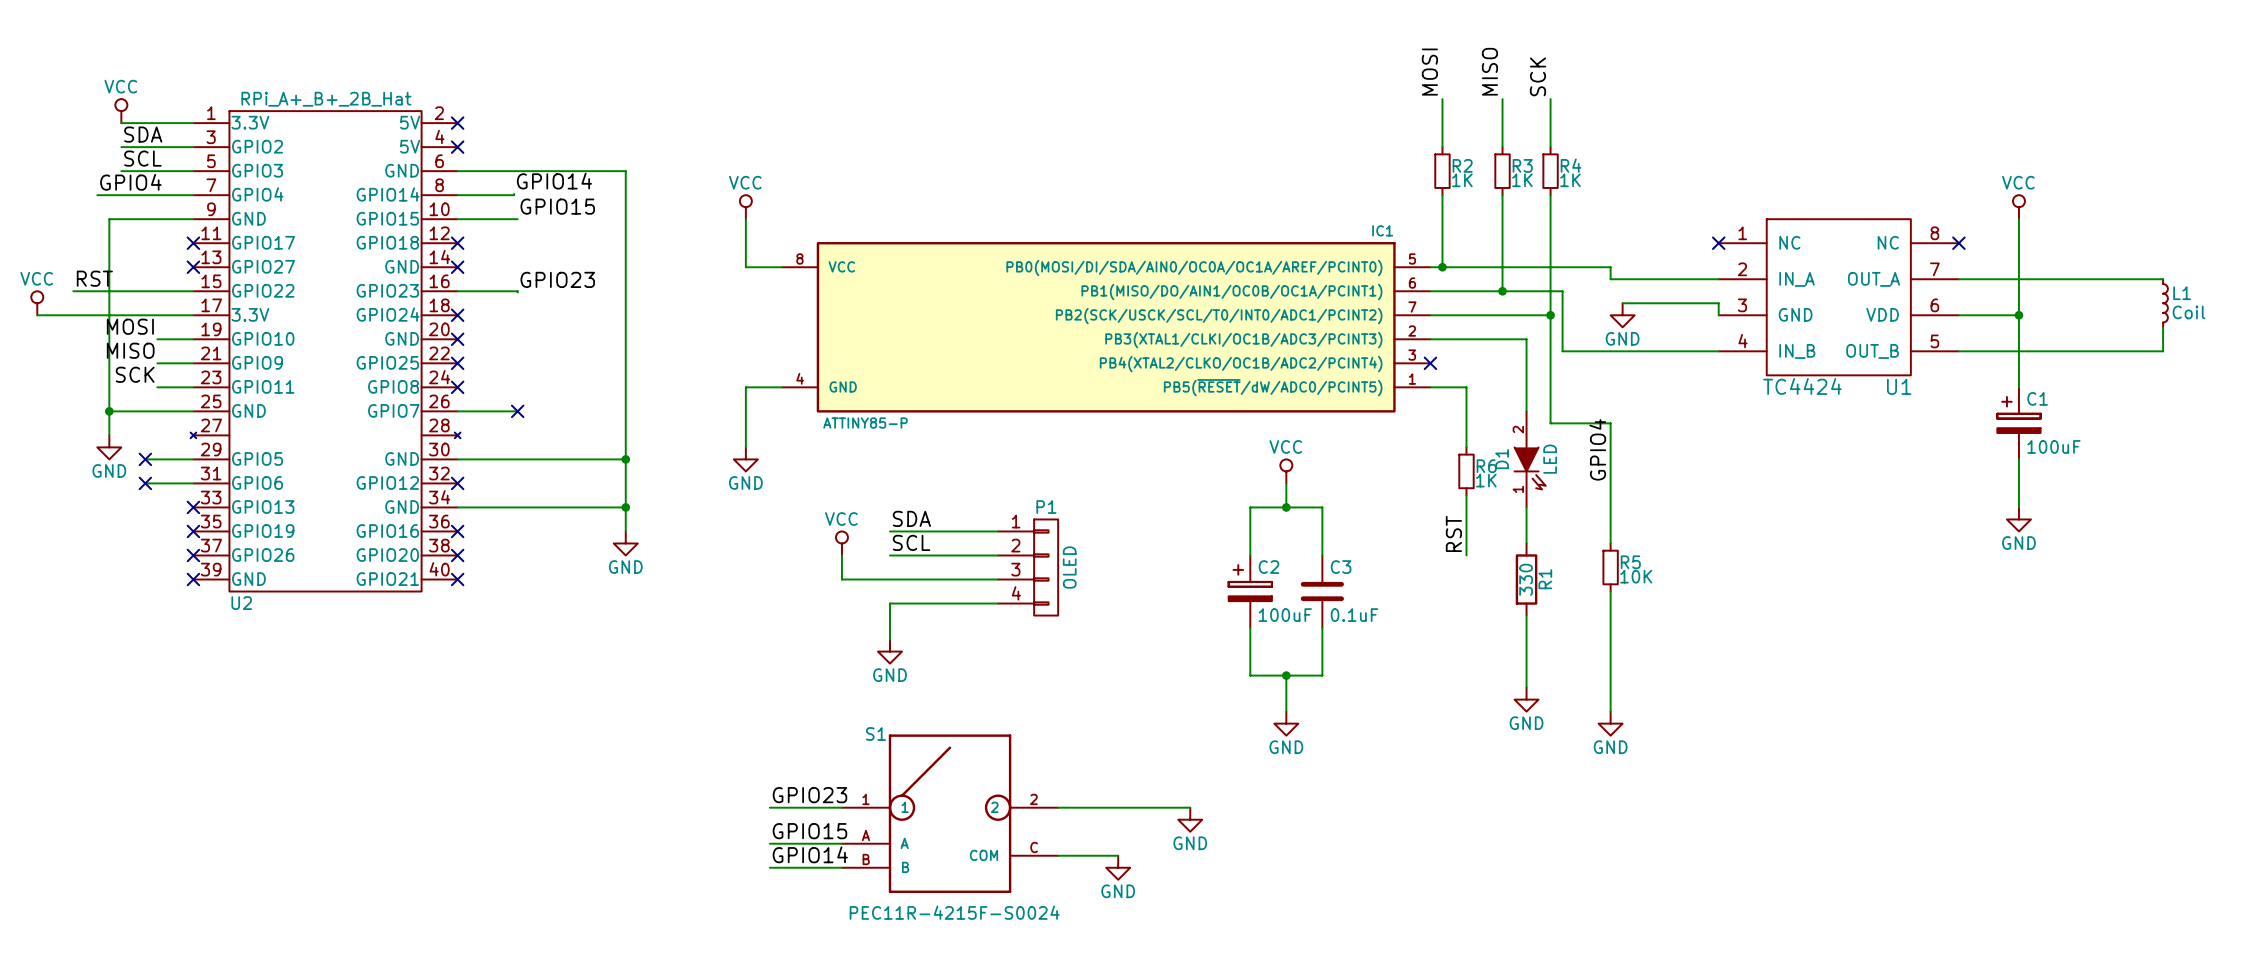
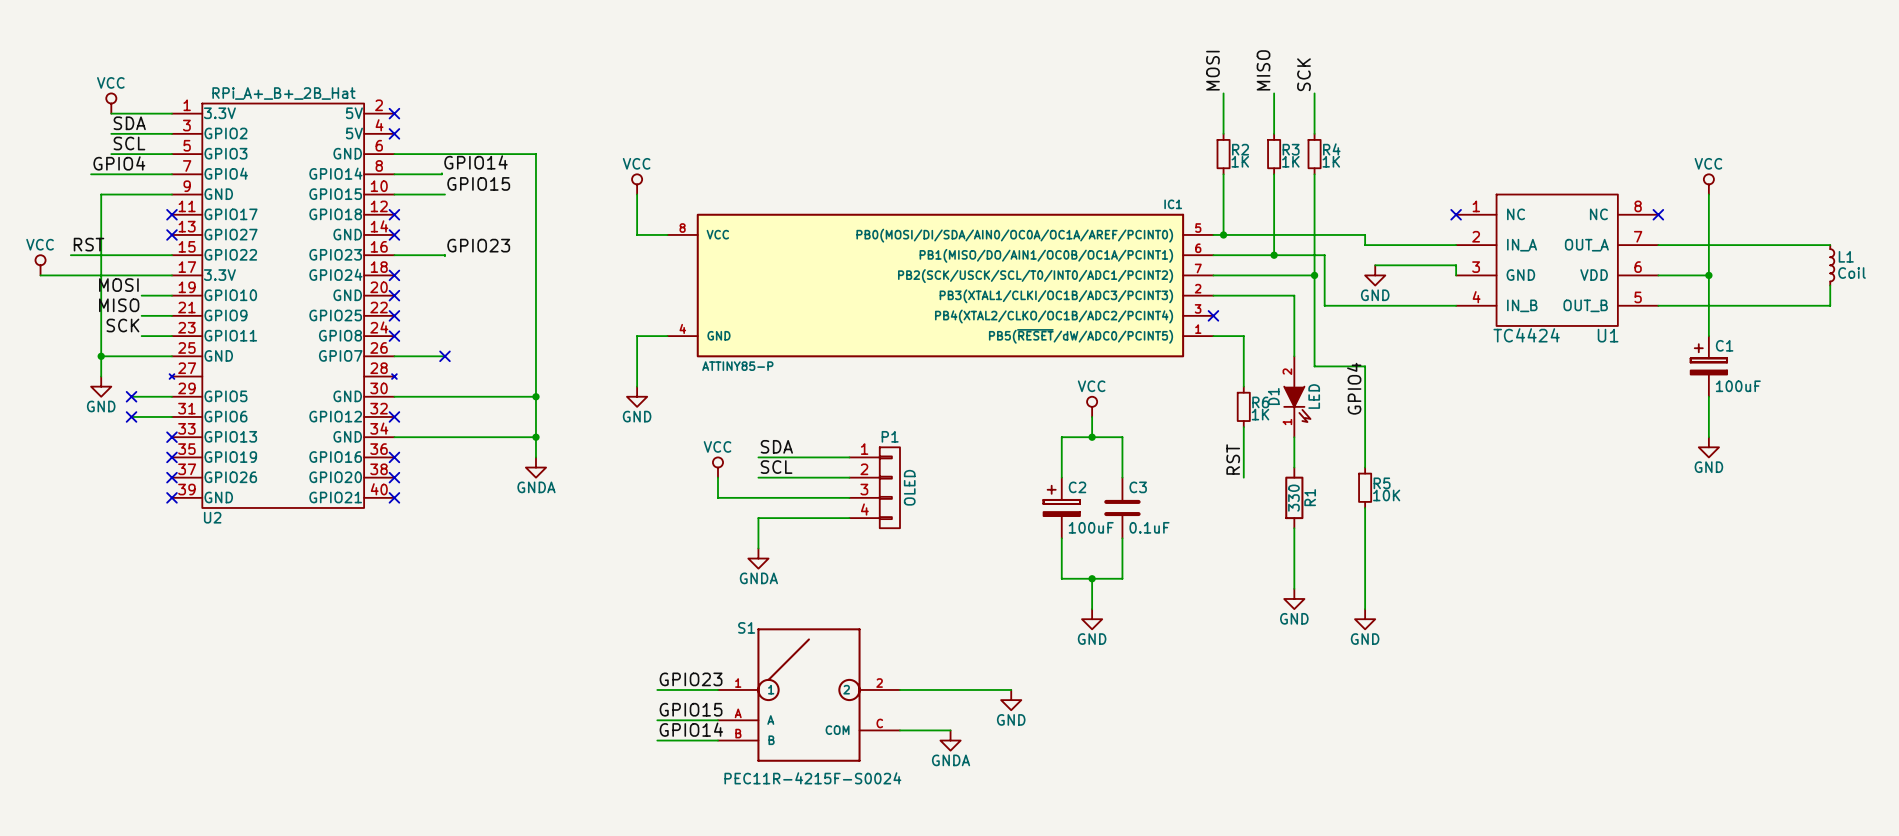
power symbol: GND (625, 543) -> GNDA (535, 467)
power symbol: GND (890, 651) -> GNDA (758, 558)
power symbol: GND (1118, 867) -> GNDA (950, 740)

